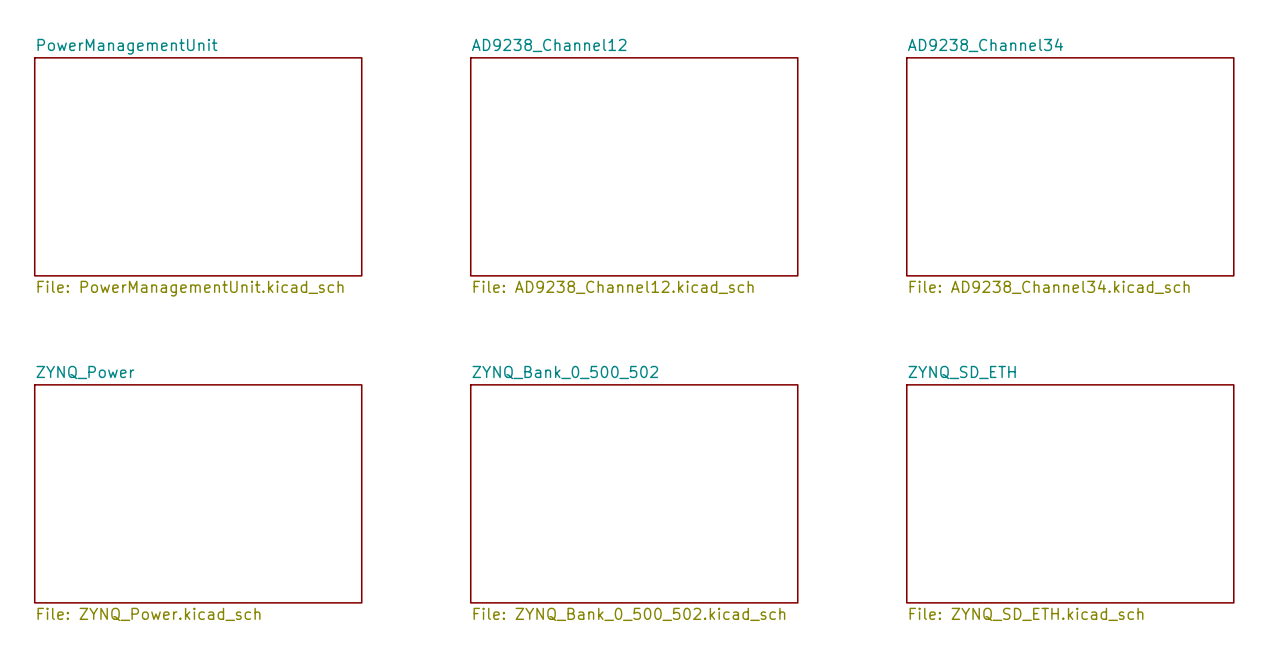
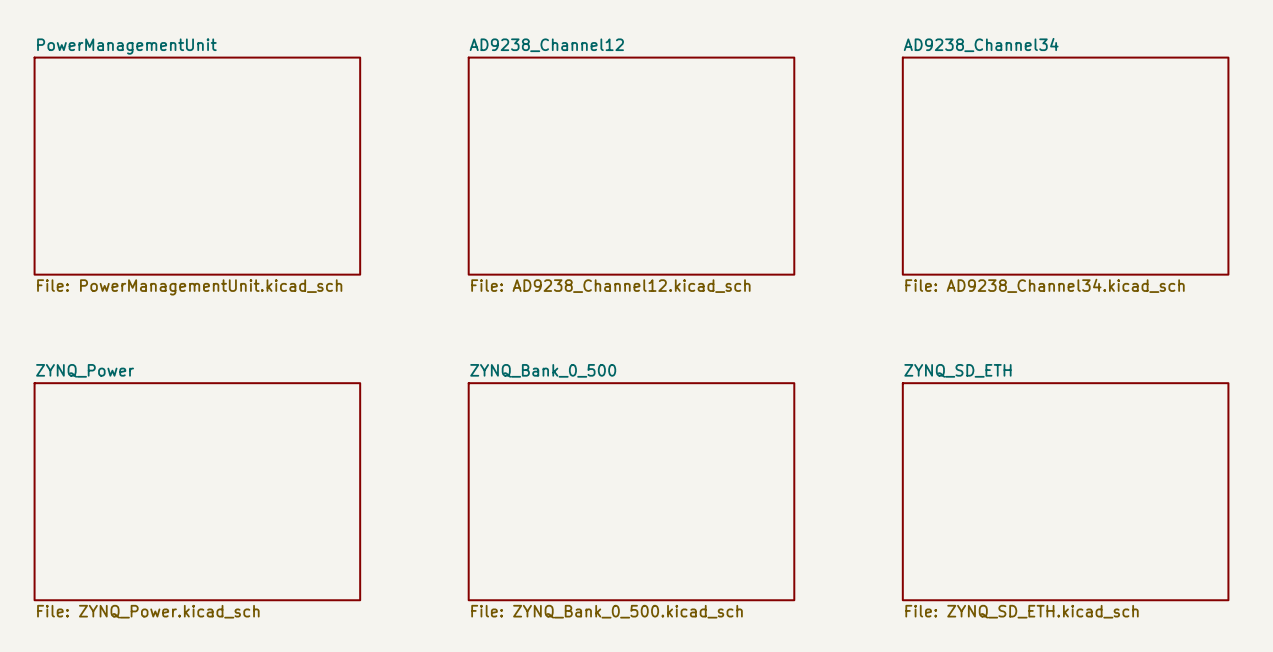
sheet ZYNQ_Bank_0_500_502 name: ZYNQ_Bank_0_500_502 (565, 372) -> ZYNQ_Bank_0_500 (543, 370)
sheet ZYNQ_Bank_0_500_502 value: File: ZYNQ_Bank_0_500_502.kicad_sch (629, 614) -> File: ZYNQ_Bank_0_500.kicad_sch (607, 611)

